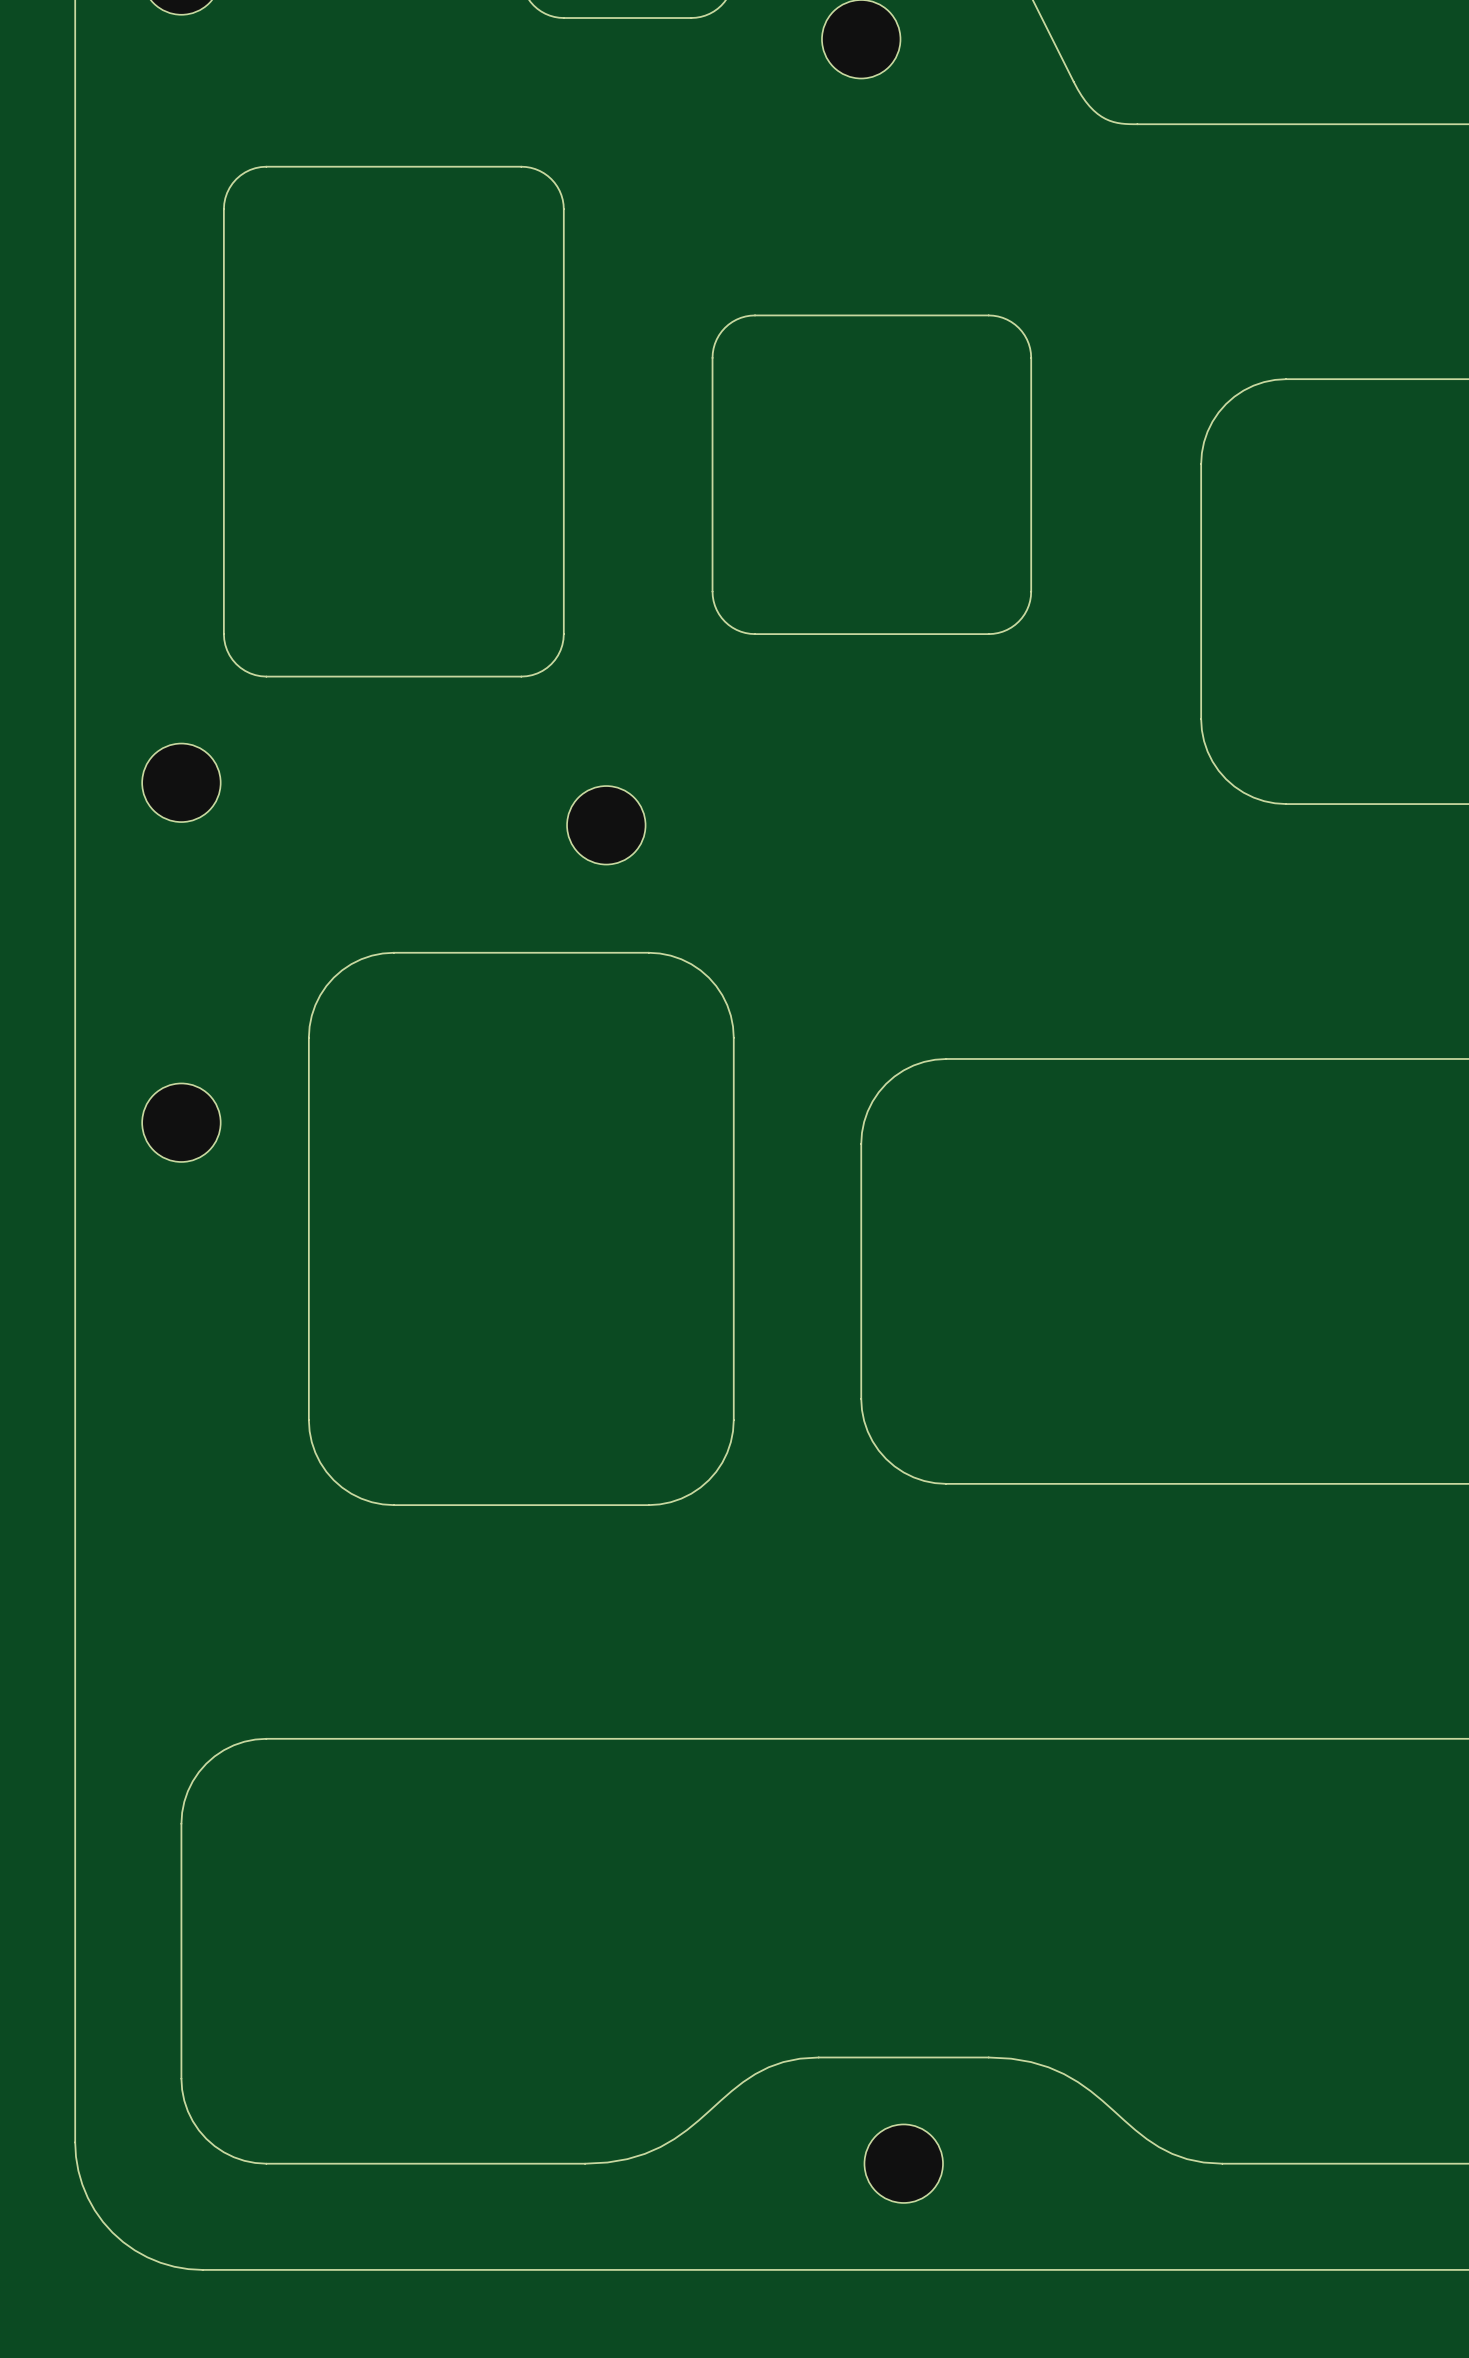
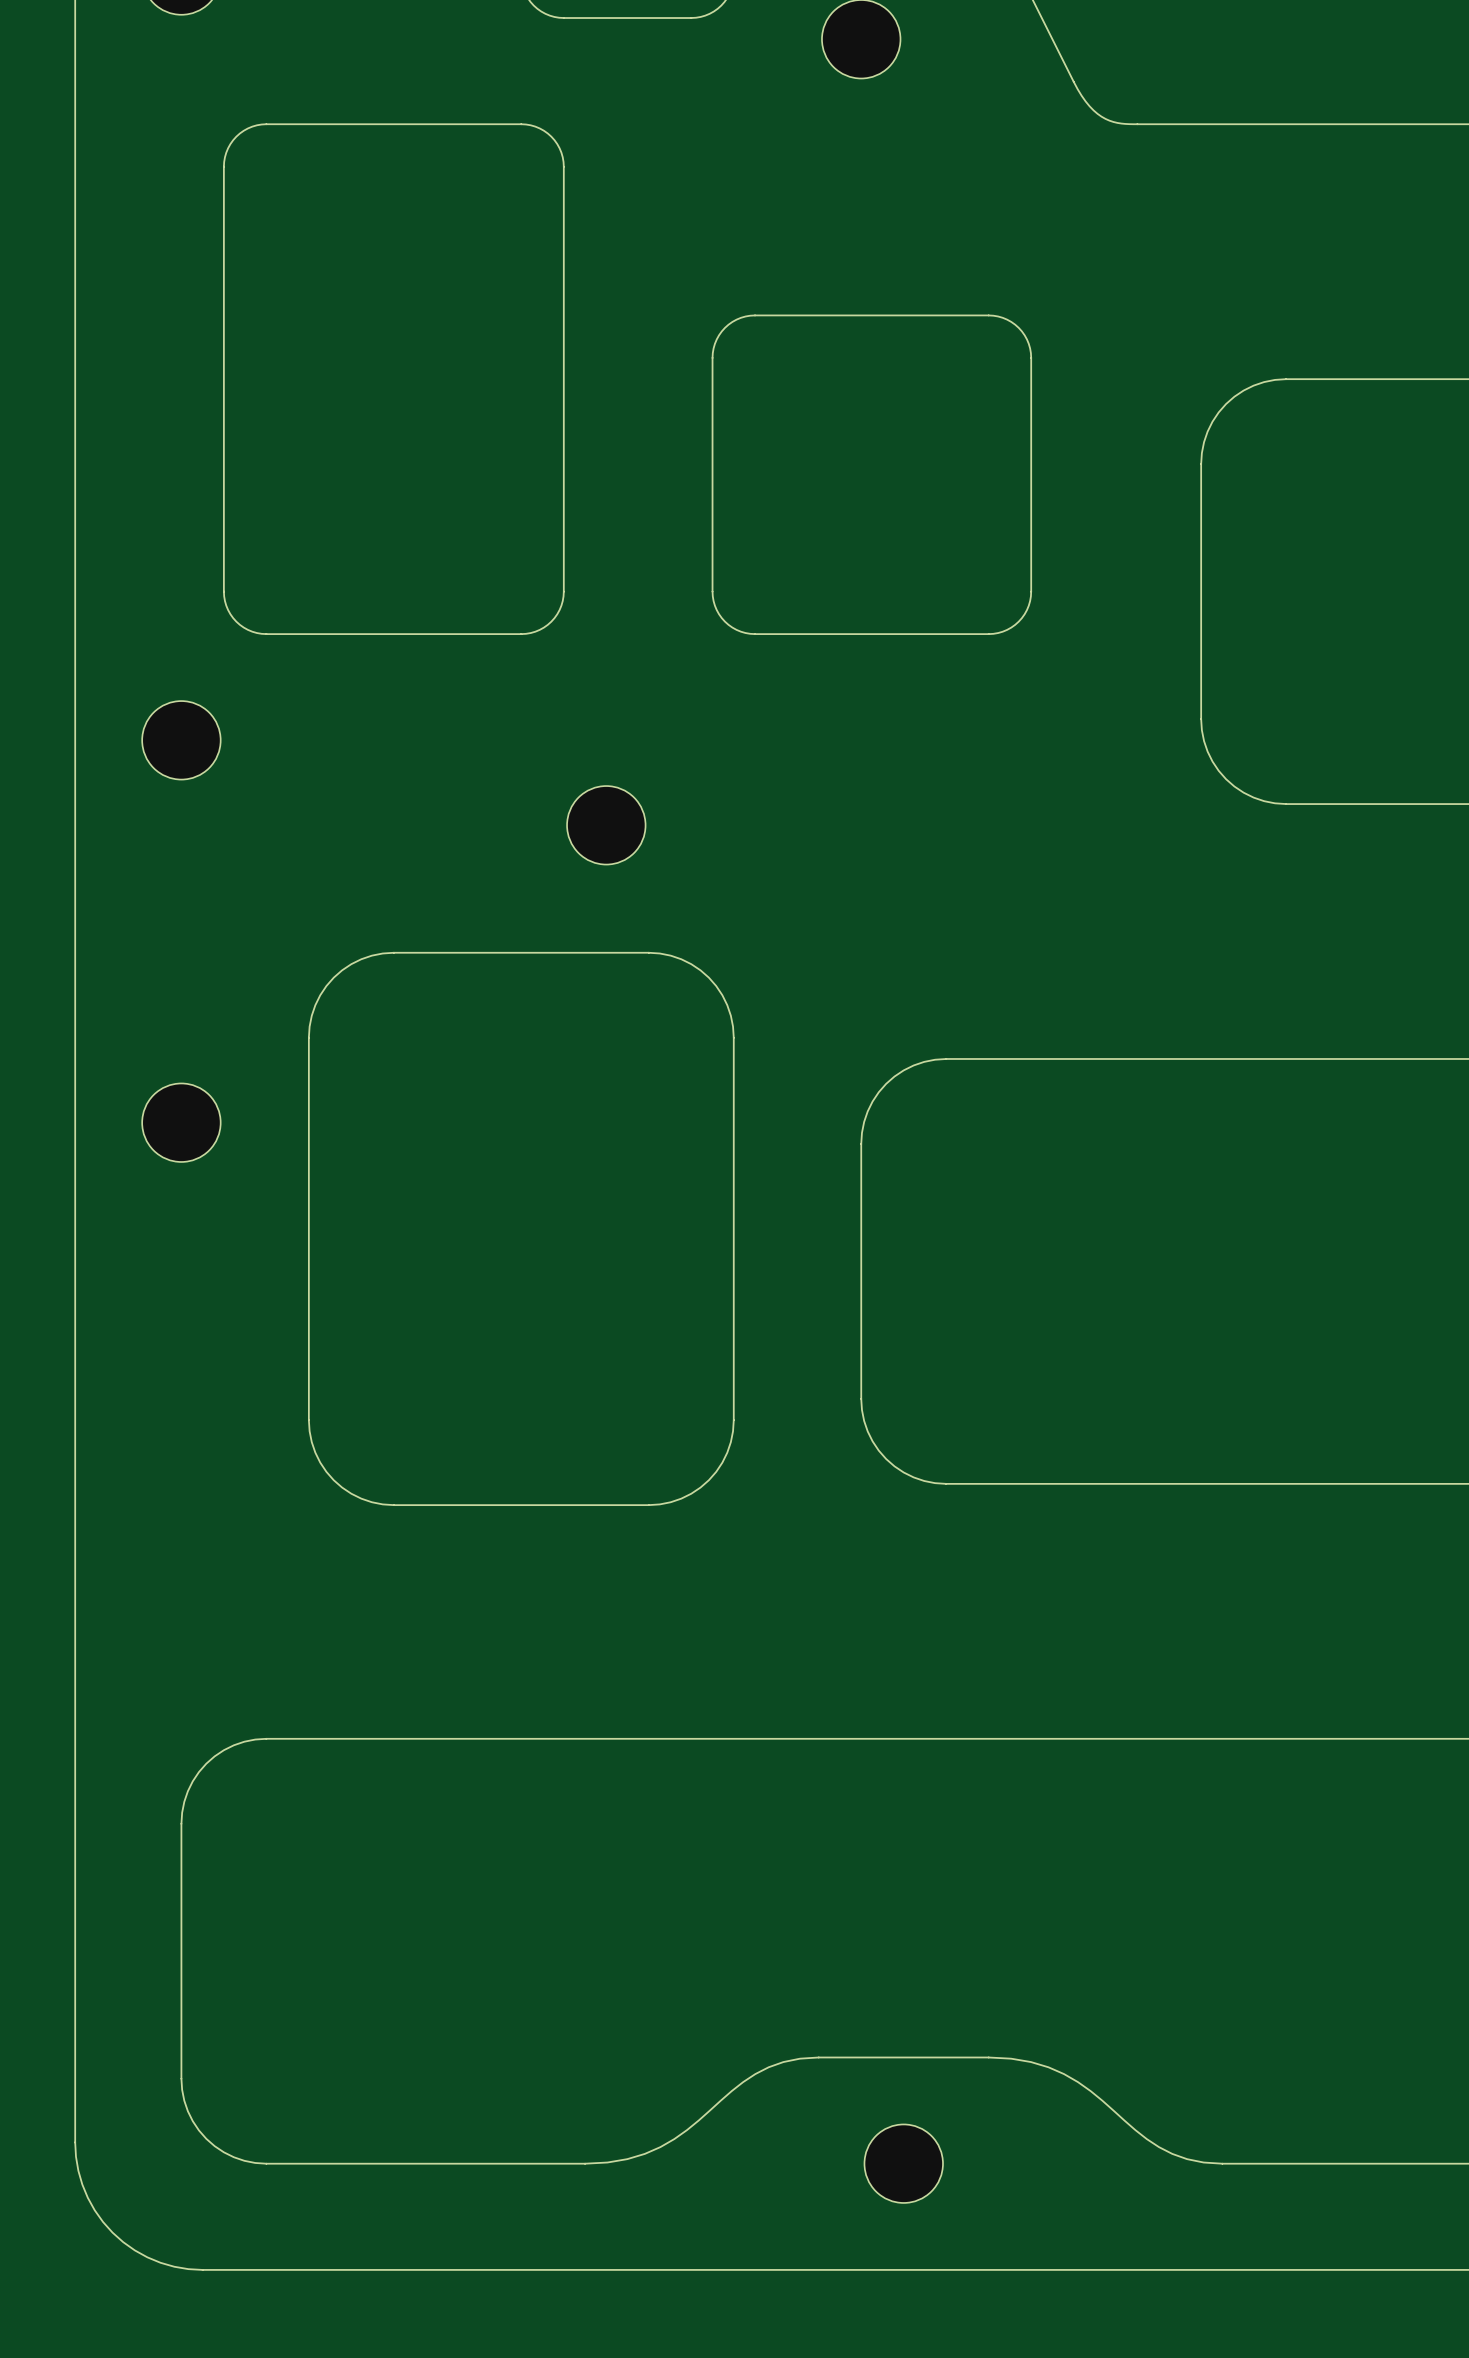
board edge: (563, 209) (561, 195) (554, 182) (543, 173) (526, 166) (266, 166) (250, 169) (236, 179) (227, 192) (223, 209) -> (563, 209) (563, 166) (561, 152) (551, 136) (543, 130) (530, 125) (266, 124) (256, 125) (243, 130) (233, 140) (228, 148) (224, 161) (223, 209)
board edge: (563, 591) (563, 639) (558, 655) (542, 670) (521, 676) (255, 675) (236, 664) (227, 650) (223, 634) (223, 591) -> (563, 591) (559, 610) (551, 621) (535, 631) (521, 634) (261, 633) (247, 629) (233, 618) (226, 605) (223, 591)
part position: (181, 782) -> (181, 740)

